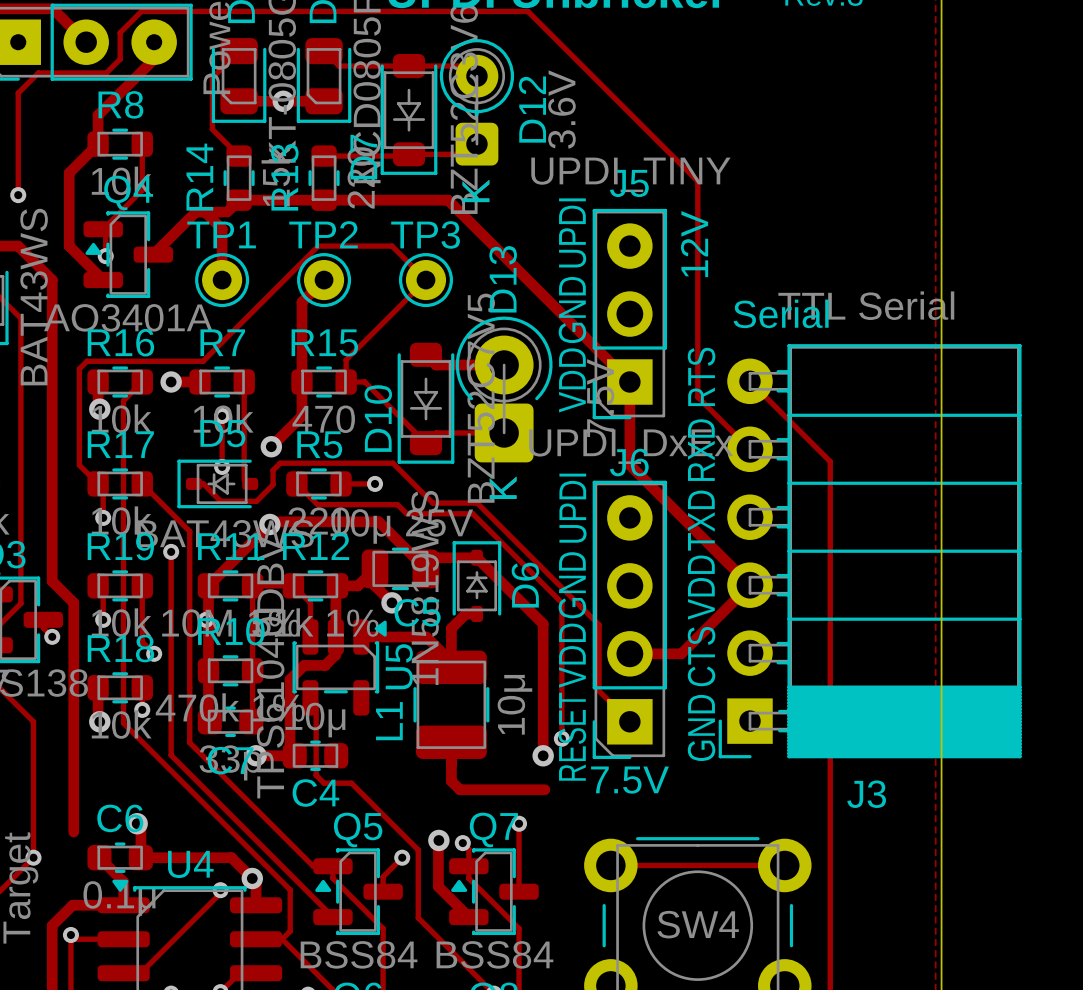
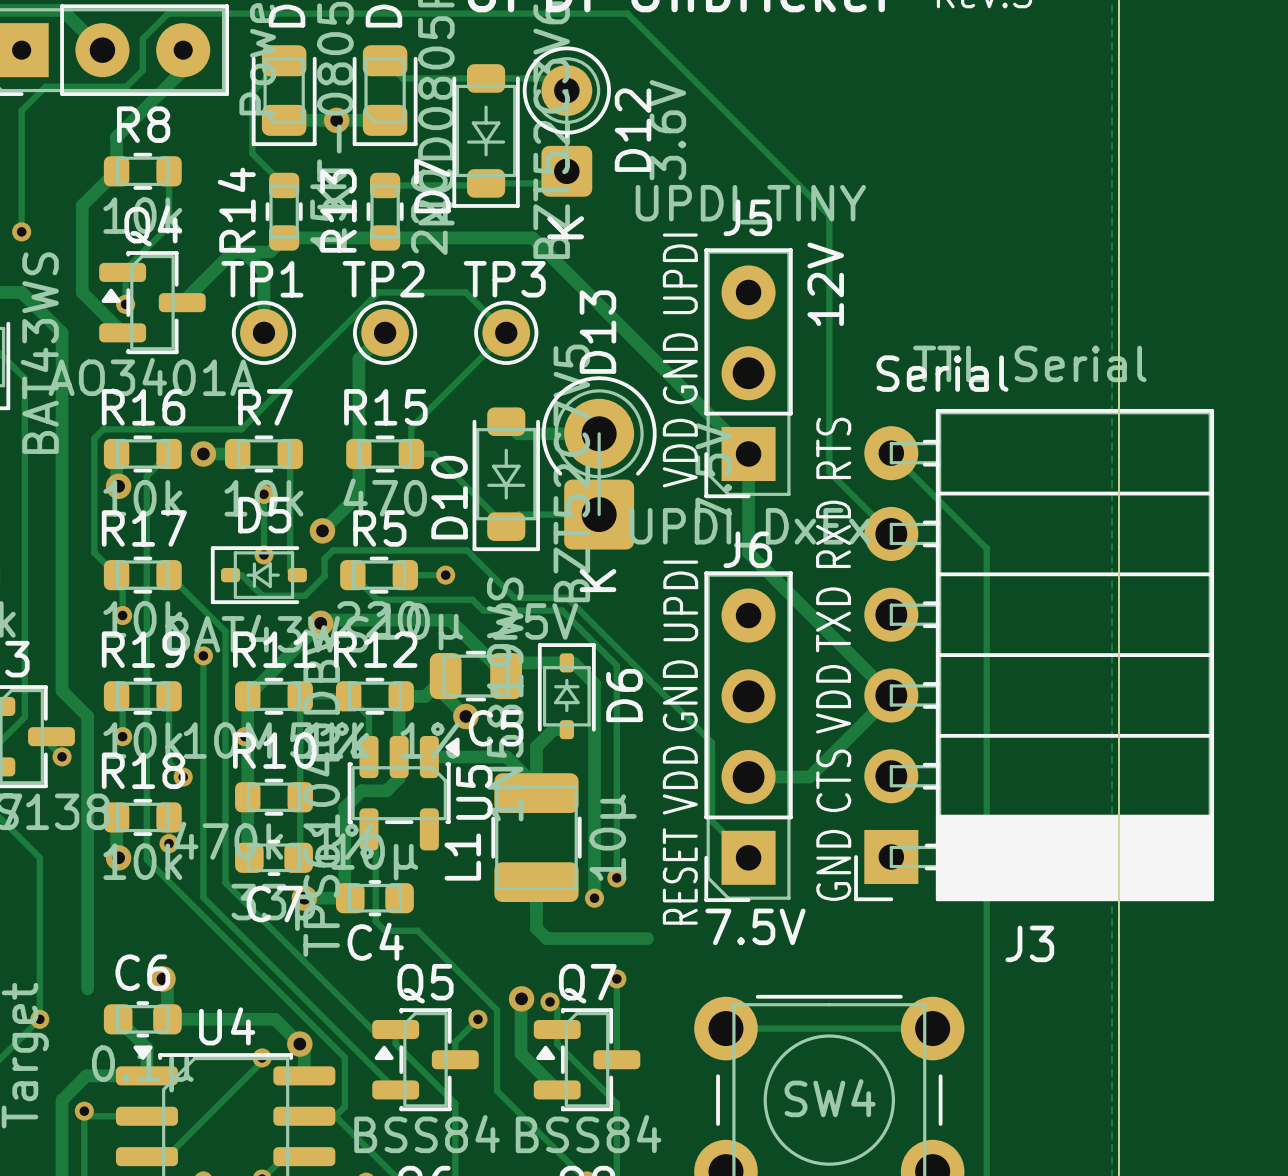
track: (476, 557) (543, 624) (543, 755) -> (566, 662) (573, 662) (594, 683) (594, 898)
track: (519, 559) (561, 602) (561, 738) -> (616, 665) (616, 878)
via: none -> (616, 878)
via: (561, 738) -> none
via: none -> (594, 898)
via: (543, 755) -> none

